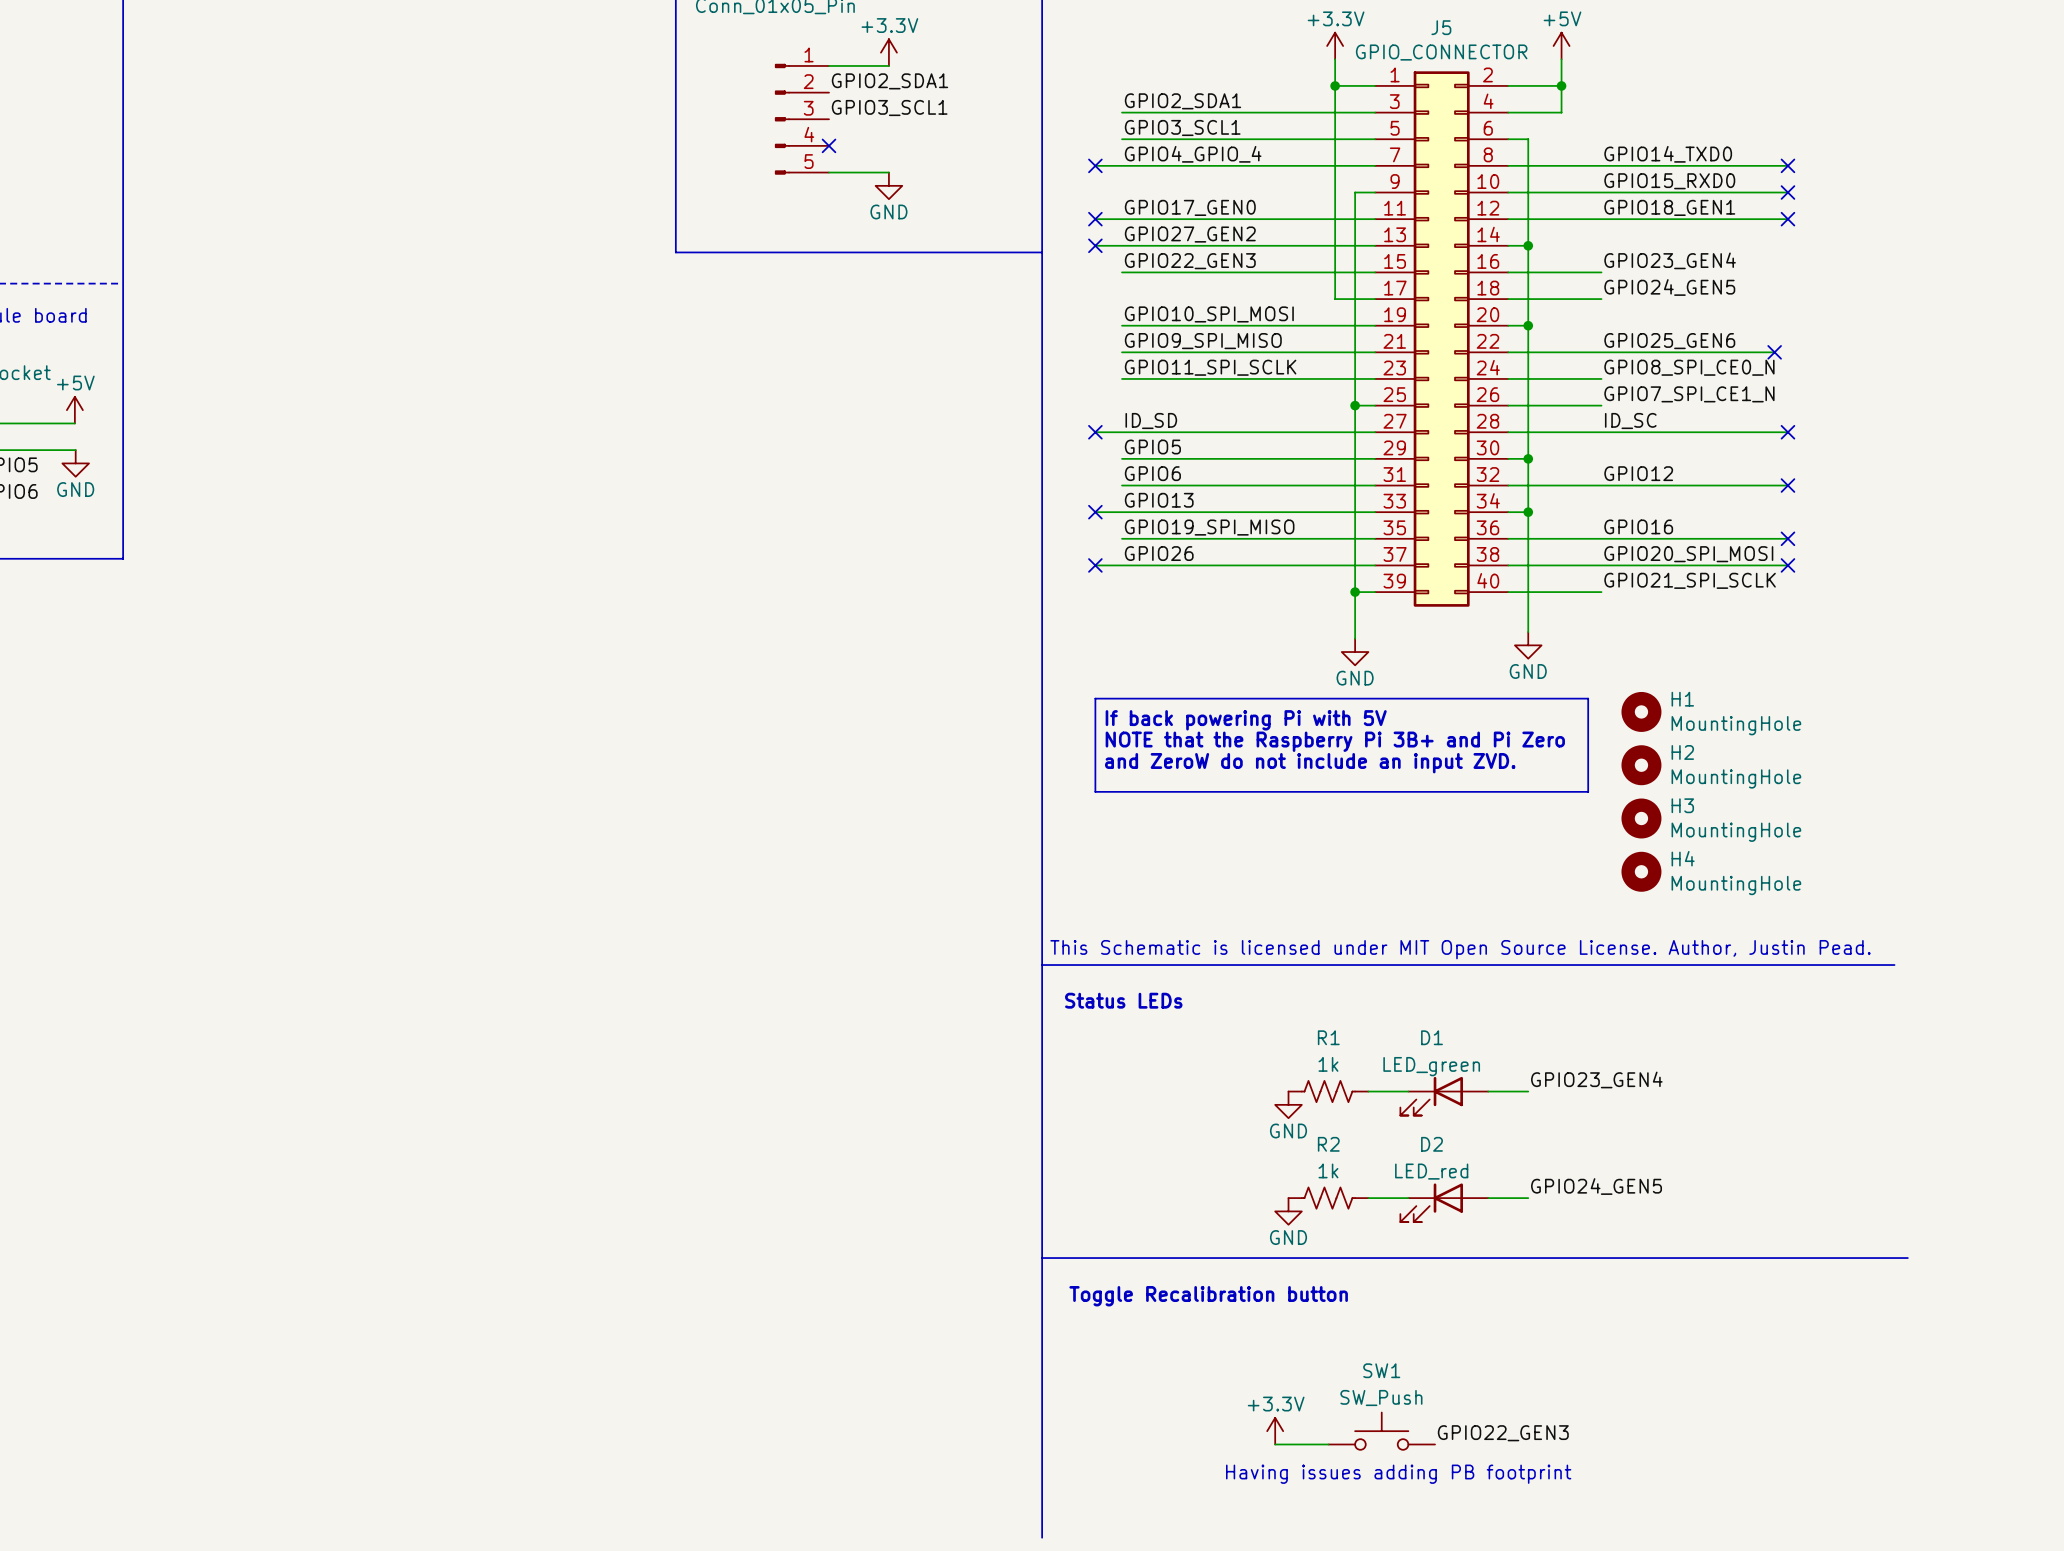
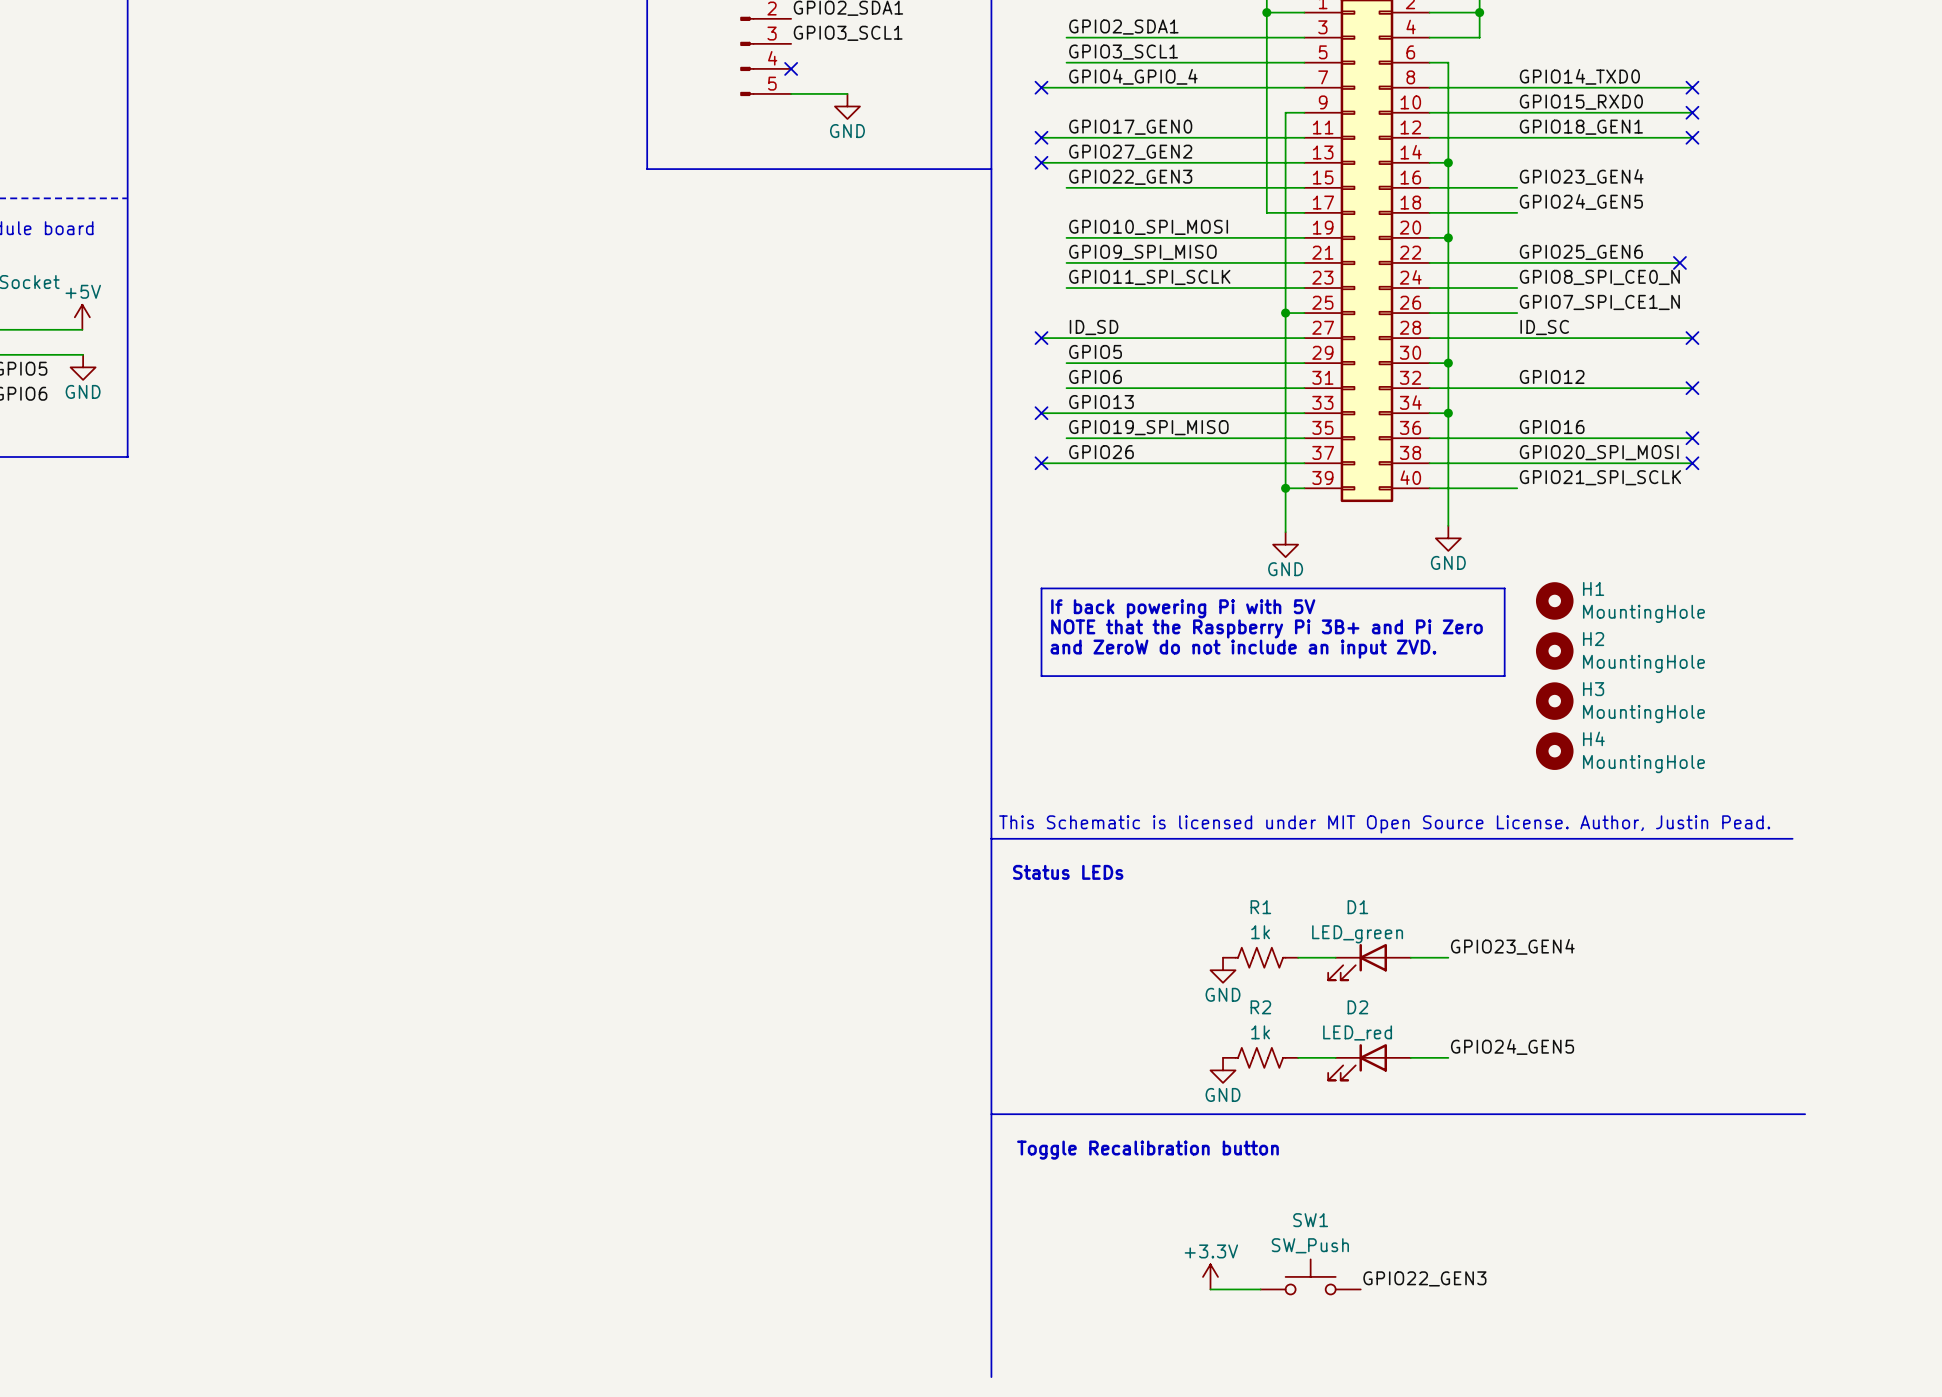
text: Having issues adding PB footprint (1398, 1474) -> none

